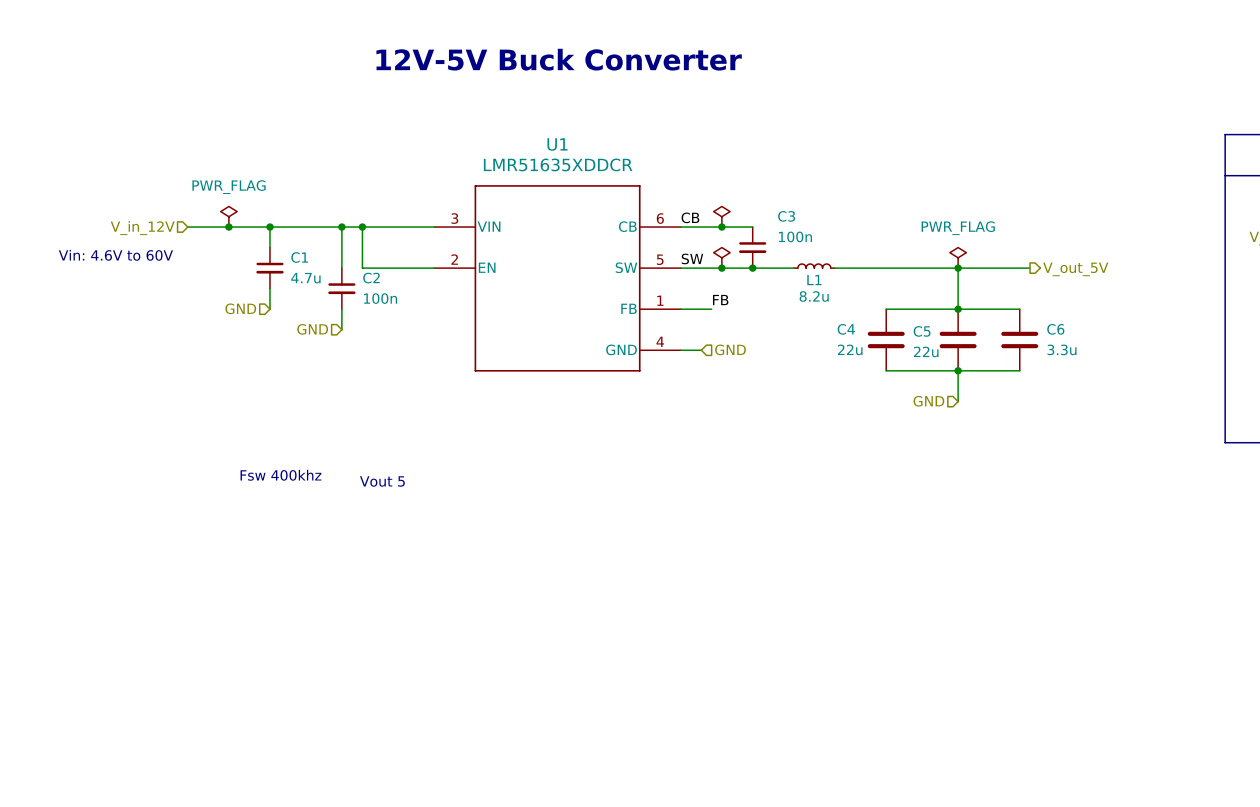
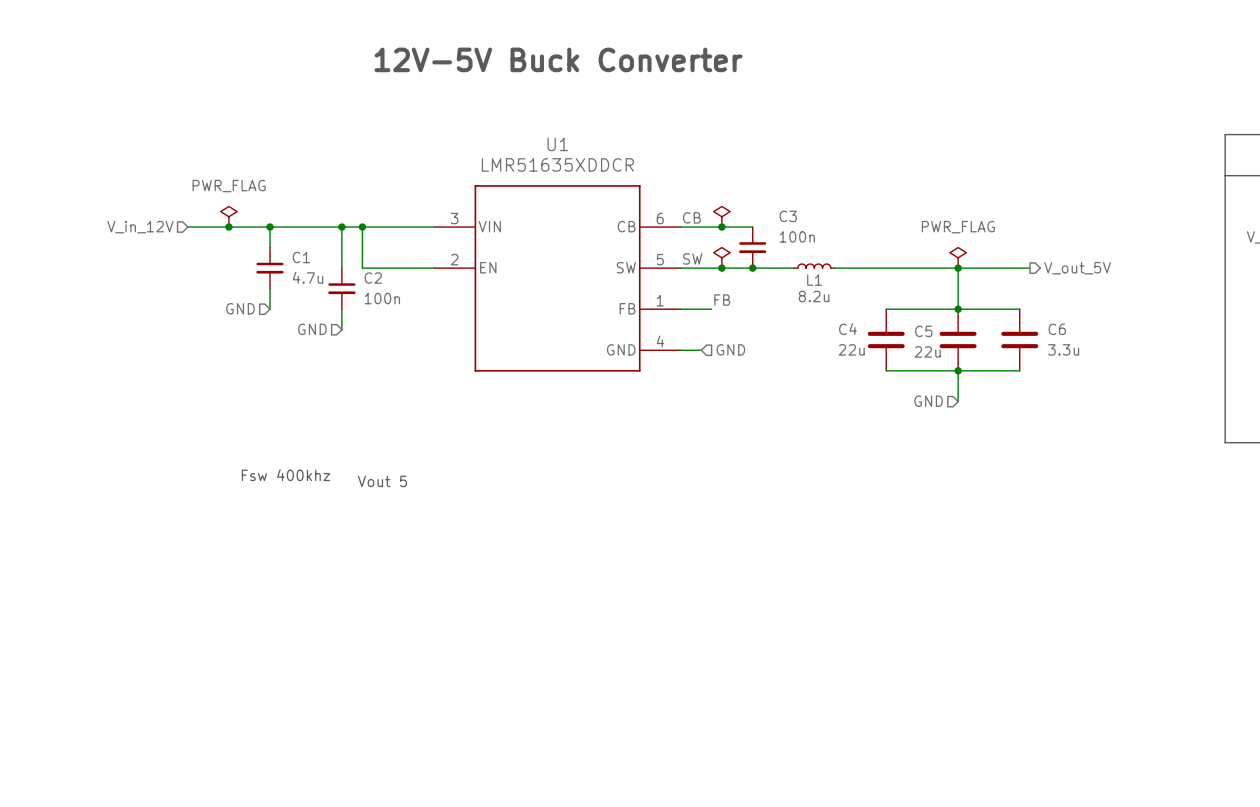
text: Vin: 4.6V to 60V (115, 255) -> none

